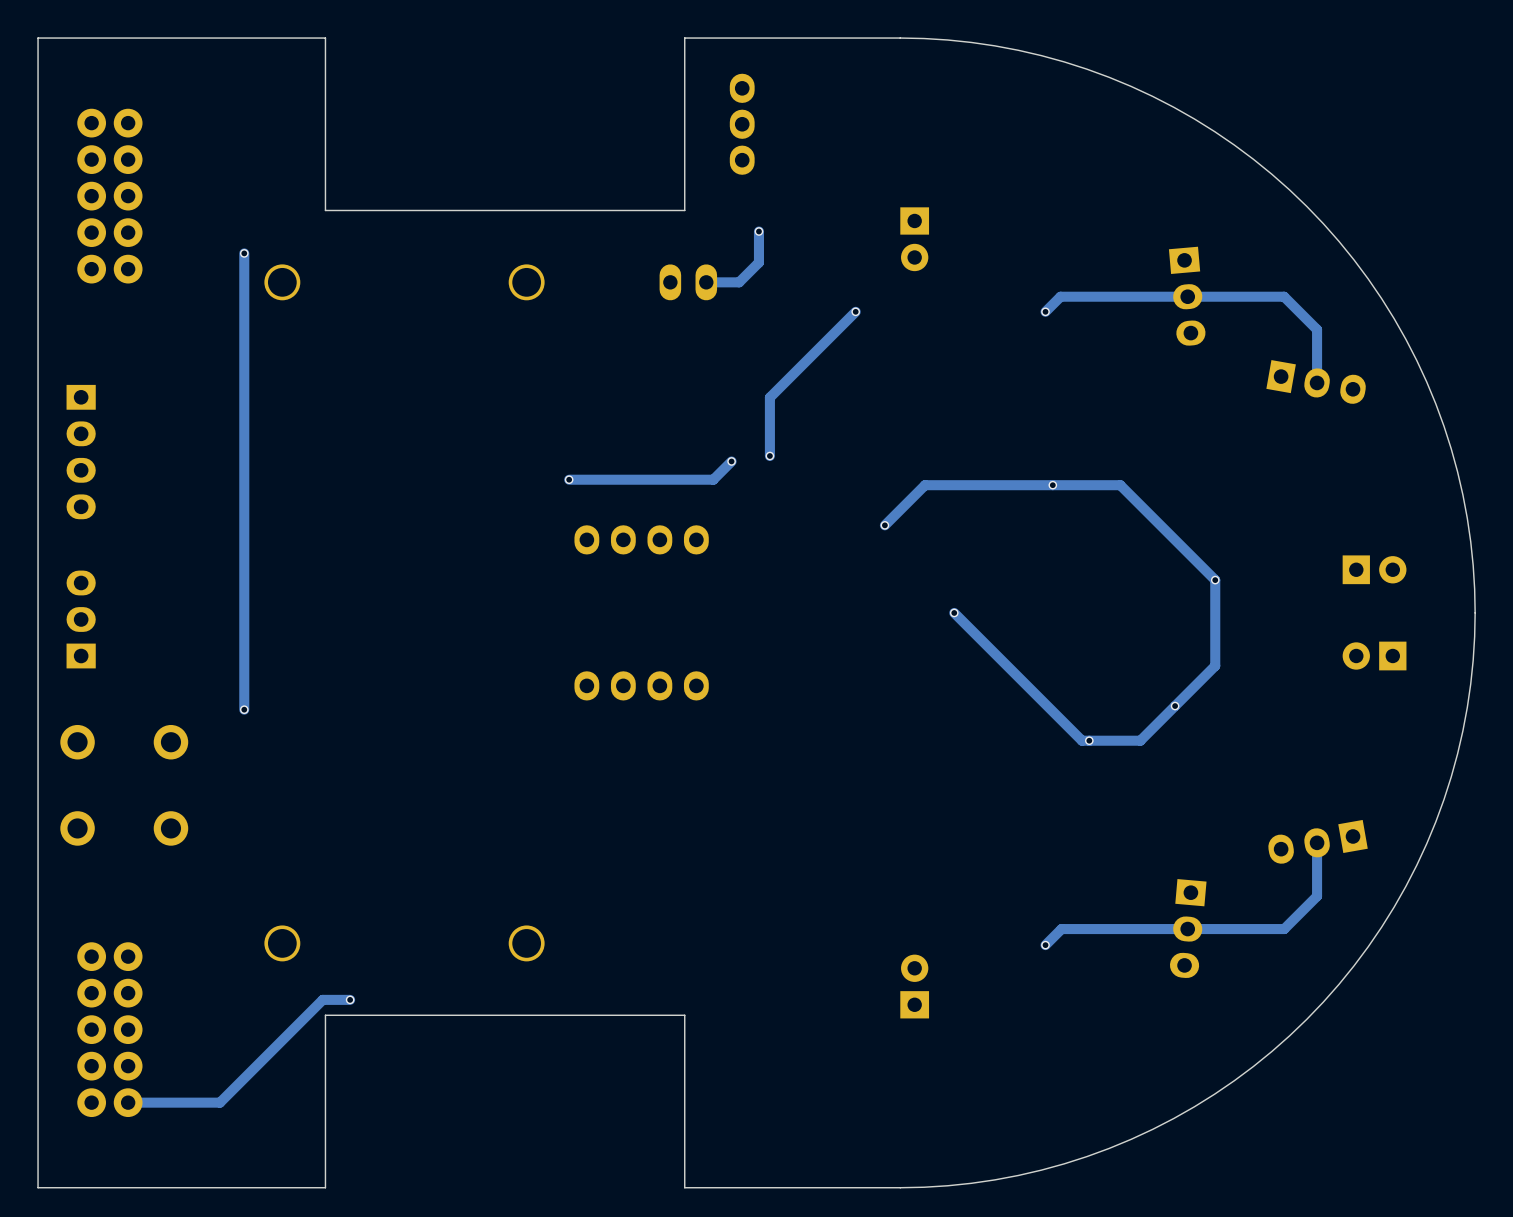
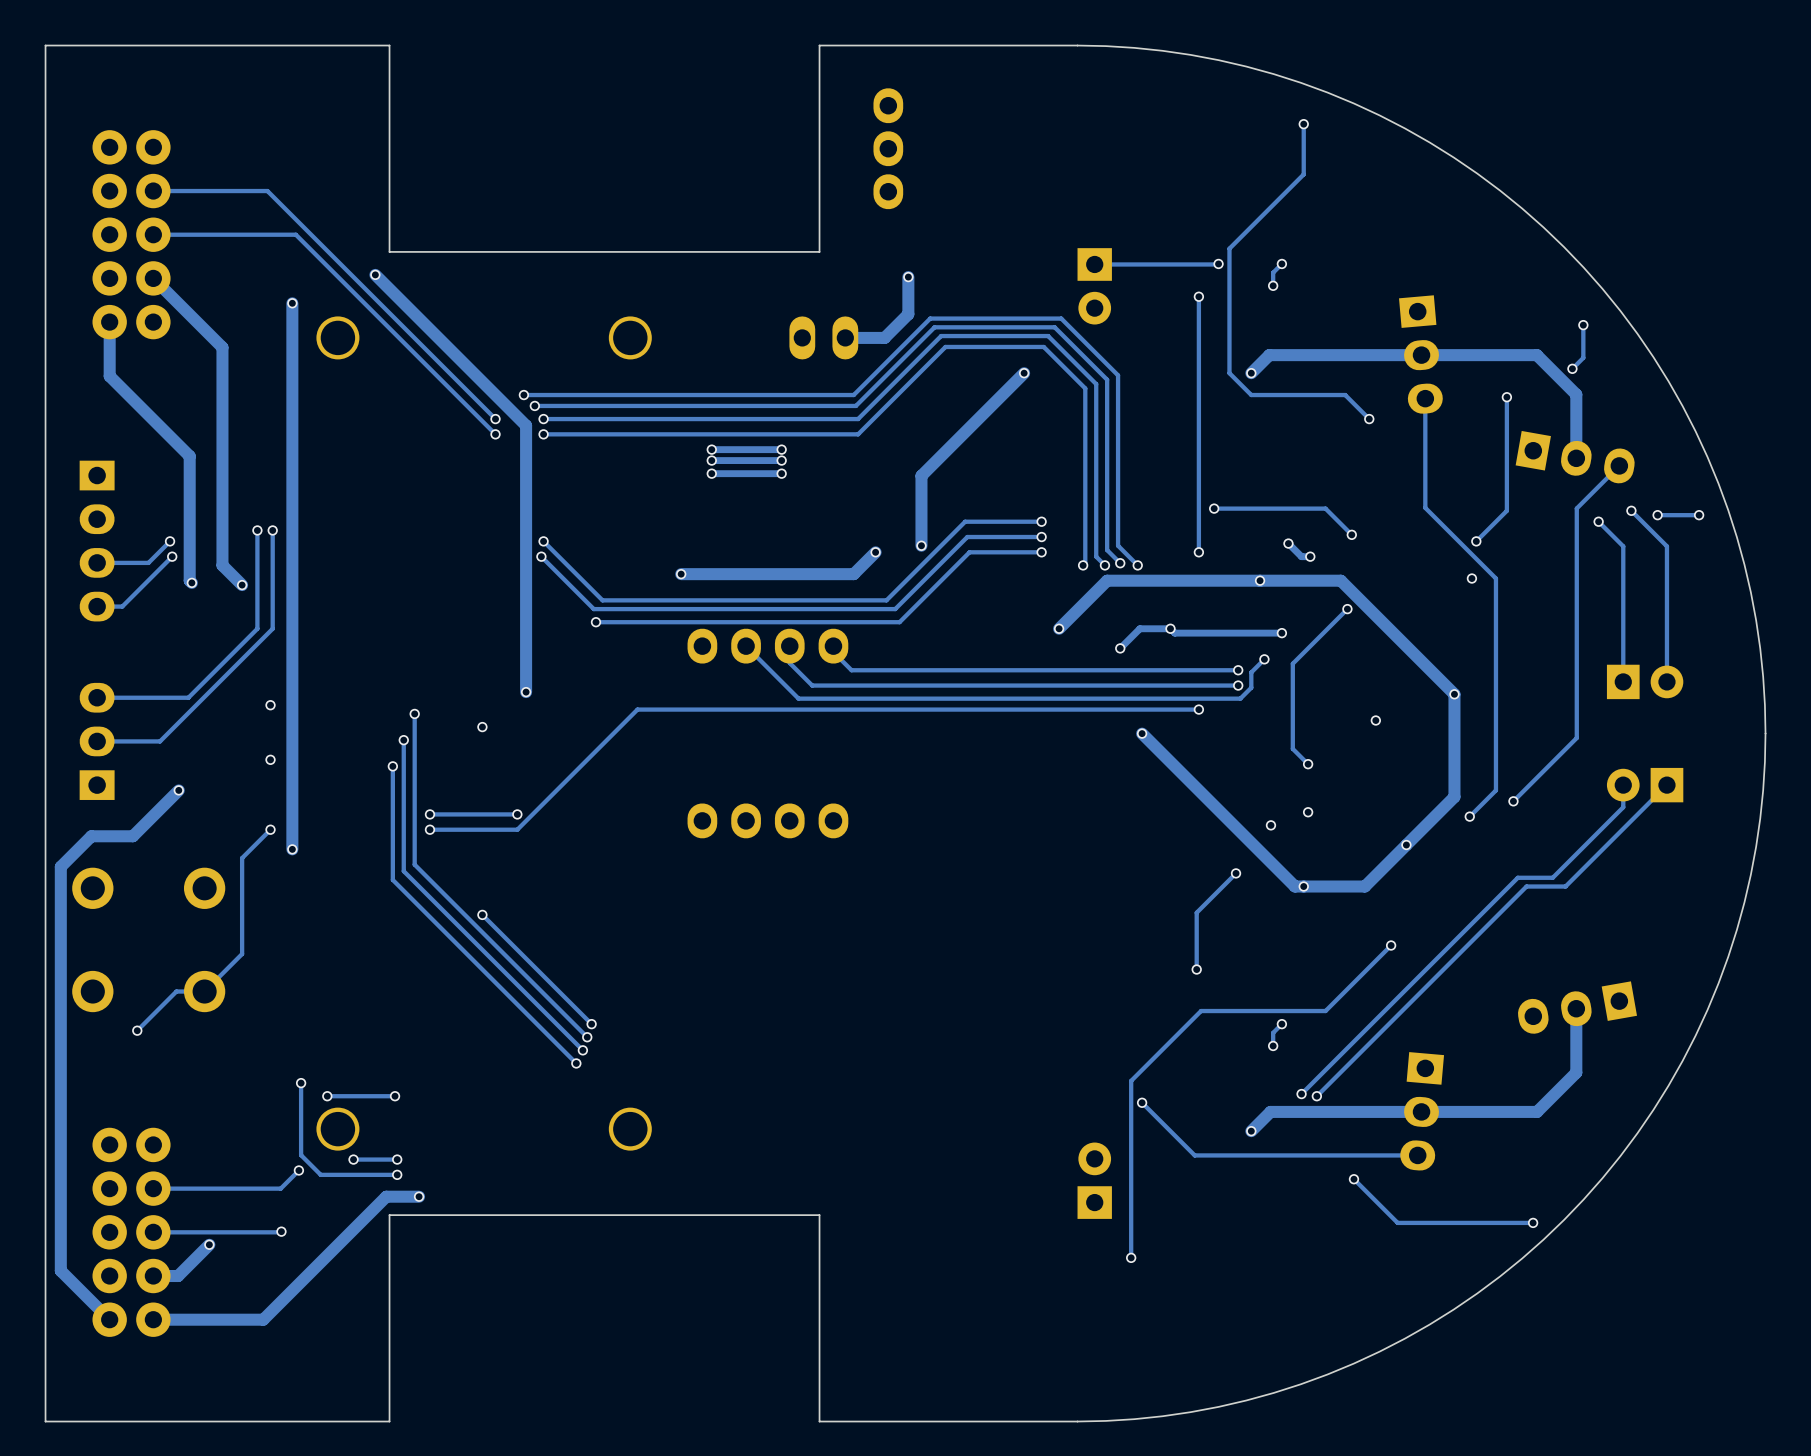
track: none -> (1303, 124) (1303, 174) (1229, 248) (1229, 373) (1251, 395) (1345, 395) (1369, 419)
via: none -> (1303, 124)
track: none -> (153, 191) (267, 191) (495, 419)
track: none -> (153, 234) (295, 234) (495, 434)
track: none -> (1218, 263) (1094, 264)
via: none -> (1218, 263)
track: none -> (1281, 263) (1273, 272) (1273, 285)
via: none -> (1281, 263)
track: none -> (375, 274) (526, 425) (526, 692)
via: none -> (375, 274)
track: none -> (153, 278) (222, 347) (222, 565) (242, 585)
via: none -> (1273, 285)
track: none -> (1198, 296) (1198, 552)
via: none -> (1198, 296)
track: none -> (109, 322) (109, 376) (189, 456) (189, 580) (191, 582)
track: none -> (1583, 325) (1583, 357) (1572, 368)
via: none -> (1583, 325)
via: none -> (1572, 368)
track: none -> (523, 395) (853, 395) (930, 318) (1061, 318) (1118, 375) (1118, 545) (1137, 565)
via: none -> (523, 395)
track: none -> (1506, 397) (1506, 510) (1476, 541)
via: none -> (1506, 397)
track: none -> (1425, 398) (1425, 507) (1495, 578) (1495, 790) (1469, 816)
track: none -> (534, 405) (855, 405) (934, 327) (1054, 327) (1107, 379) (1107, 550) (1120, 563)
via: none -> (534, 405)
via: none -> (495, 419)
track: none -> (543, 419) (858, 419) (941, 336) (1048, 336) (1096, 384) (1096, 556) (1104, 565)
via: none -> (543, 419)
via: none -> (1369, 419)
via: none -> (495, 434)
track: none -> (543, 434) (858, 434) (945, 346) (1043, 346) (1085, 388) (1085, 563) (1083, 565)
via: none -> (543, 434)
via: none -> (711, 449)
track: none -> (781, 449) (711, 449)
via: none -> (781, 449)
via: none -> (711, 460)
track: none -> (781, 460) (711, 460)
via: none -> (781, 460)
track: none -> (1619, 465) (1576, 508) (1576, 737) (1513, 801)
via: none -> (711, 473)
track: none -> (781, 473) (711, 473)
via: none -> (781, 473)
track: none -> (1214, 508) (1325, 508) (1351, 534)
via: none -> (1214, 508)
track: none -> (1631, 510) (1666, 546) (1666, 681)
via: none -> (1631, 510)
via: none -> (1657, 515)
track: none -> (1699, 515) (1657, 515)
via: none -> (1699, 515)
track: none -> (1041, 521) (965, 521) (886, 600) (602, 600) (543, 541)
via: none -> (1041, 521)
track: none -> (1598, 521) (1623, 546) (1623, 681)
via: none -> (1598, 521)
track: none -> (257, 530) (257, 628) (188, 697) (97, 697)
via: none -> (257, 530)
track: none -> (272, 530) (272, 628) (160, 741) (97, 741)
via: none -> (272, 530)
via: none -> (1351, 534)
track: none -> (1041, 537) (967, 537) (895, 609) (593, 609) (541, 556)
via: none -> (1041, 537)
track: none -> (170, 541) (148, 562) (97, 562)
via: none -> (170, 541)
via: none -> (543, 541)
via: none -> (1476, 541)
track: none -> (1288, 543) (1301, 556) (1310, 556)
via: none -> (1288, 543)
track: none -> (1041, 552) (969, 552) (899, 622) (595, 622)
via: none -> (1041, 552)
via: none -> (1198, 552)
track: none -> (172, 556) (122, 606) (97, 606)
via: none -> (172, 556)
via: none -> (541, 556)
via: none -> (1310, 556)
via: none -> (1120, 563)
via: none -> (1083, 565)
via: none -> (1104, 565)
via: none -> (1137, 565)
via: none -> (1471, 578)
via: none -> (191, 582)
via: none -> (242, 585)
track: none -> (1347, 609) (1292, 663) (1292, 748) (1308, 764)
via: none -> (1347, 609)
via: none -> (595, 622)
via: none -> (1170, 628)
track: none -> (1281, 633) (1174, 633) (1170, 628) (1139, 628) (1120, 648)
via: none -> (1281, 633)
track: none -> (746, 646) (798, 698) (1240, 698) (1251, 687) (1251, 672) (1264, 659)
track: none -> (789, 646) (789, 663) (812, 685) (1238, 685)
track: none -> (833, 646) (833, 652) (851, 670) (1238, 670)
via: none -> (1120, 648)
via: none -> (1264, 659)
via: none -> (1238, 670)
via: none -> (1238, 685)
via: none -> (526, 692)
via: none -> (270, 705)
track: none -> (1198, 709) (637, 709) (517, 829) (429, 829)
via: none -> (1198, 709)
track: none -> (414, 713) (414, 864) (587, 1037)
via: none -> (414, 713)
via: none -> (1375, 720)
via: none -> (482, 727)
track: none -> (403, 740) (403, 871) (582, 1050)
via: none -> (403, 740)
via: none -> (270, 759)
via: none -> (1308, 764)
track: none -> (392, 766) (392, 879) (576, 1063)
via: none -> (392, 766)
track: none -> (1623, 785) (1623, 807) (1552, 877) (1517, 877) (1301, 1094)
track: none -> (1666, 785) (1565, 886) (1526, 886) (1316, 1096)
track: none -> (178, 790) (132, 836) (91, 836) (60, 866) (60, 1270) (109, 1319)
via: none -> (178, 790)
via: none -> (1513, 801)
via: none -> (1308, 812)
via: none -> (429, 814)
track: none -> (517, 814) (429, 814)
via: none -> (517, 814)
via: none -> (1469, 816)
via: none -> (1270, 825)
track: none -> (270, 829) (242, 858) (242, 954) (204, 991) (176, 991) (137, 1030)
via: none -> (270, 829)
via: none -> (429, 829)
track: none -> (1236, 873) (1196, 912) (1196, 969)
via: none -> (1236, 873)
track: none -> (482, 914) (591, 1024)
via: none -> (482, 914)
track: none -> (1391, 945) (1325, 1011) (1201, 1011) (1131, 1080) (1131, 1257)
via: none -> (1391, 945)
via: none -> (1196, 969)
via: none -> (591, 1024)
track: none -> (1281, 1024) (1273, 1032) (1273, 1045)
via: none -> (1281, 1024)
via: none -> (137, 1030)
via: none -> (587, 1037)
via: none -> (1273, 1045)
via: none -> (582, 1050)
via: none -> (576, 1063)
track: none -> (301, 1083) (301, 1155) (320, 1174) (397, 1174)
via: none -> (301, 1083)
via: none -> (1301, 1094)
via: none -> (327, 1096)
track: none -> (395, 1096) (327, 1096)
via: none -> (395, 1096)
via: none -> (1316, 1096)
track: none -> (1142, 1102) (1194, 1155) (1417, 1155)
via: none -> (1142, 1102)
via: none -> (353, 1159)
track: none -> (397, 1159) (353, 1159)
via: none -> (397, 1159)
track: none -> (298, 1170) (280, 1188) (153, 1188)
via: none -> (298, 1170)
via: none -> (397, 1174)
track: none -> (1353, 1179) (1397, 1222) (1533, 1222)
via: none -> (1353, 1179)
via: none -> (1533, 1222)
track: none -> (281, 1231) (153, 1232)
via: none -> (281, 1231)
track: none -> (209, 1244) (178, 1276) (153, 1276)
via: none -> (209, 1244)
via: none -> (1131, 1257)

